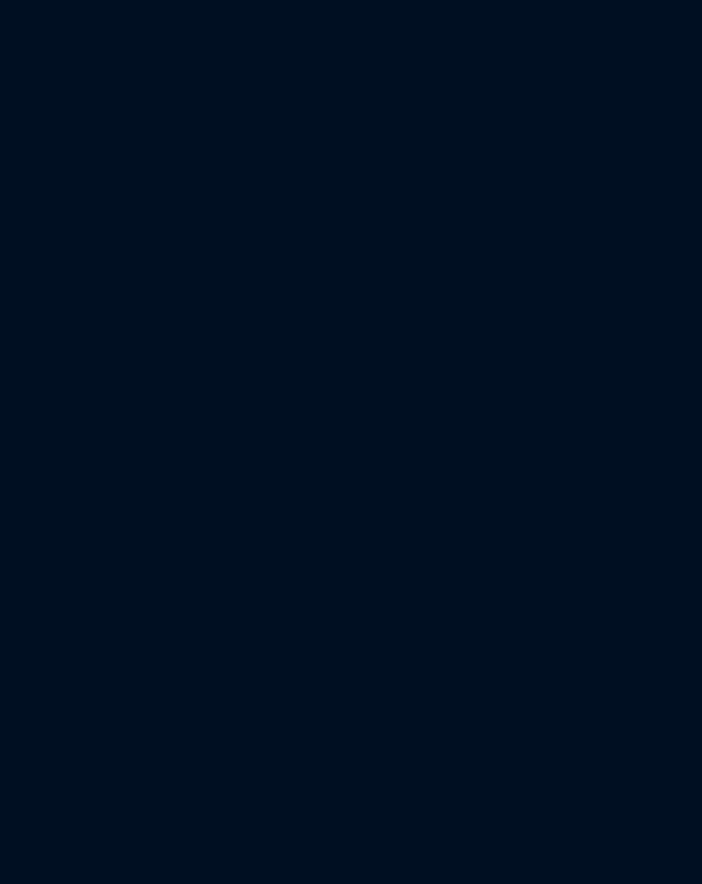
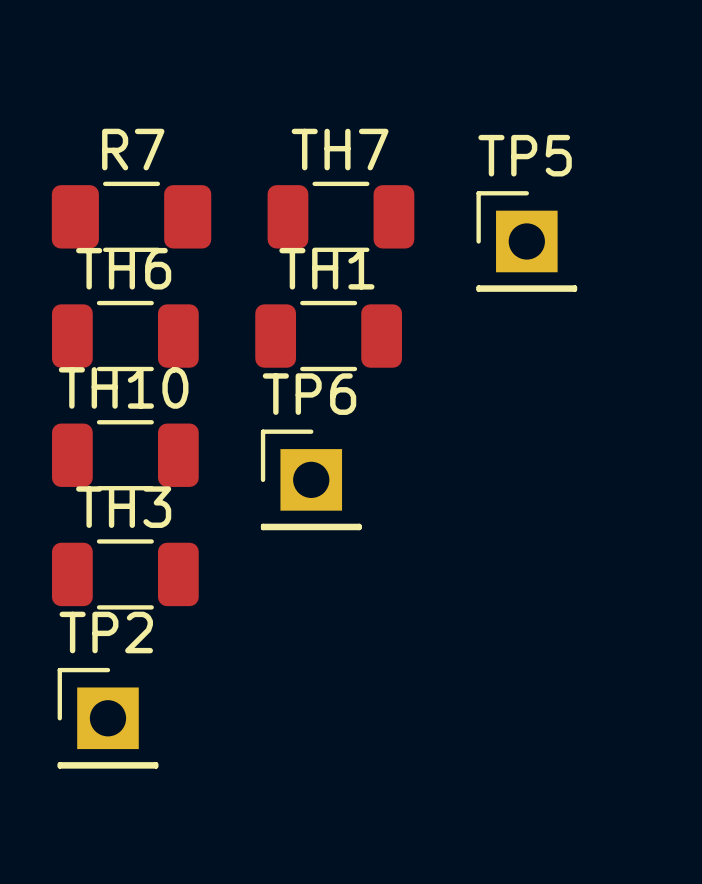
R7: none -> (131, 216)
TH7: none -> (340, 216)
TP5: none -> (526, 241)
TH6: none -> (125, 336)
TH1: none -> (328, 336)
TH10: none -> (125, 455)
TP6: none -> (311, 479)
TH3: none -> (125, 574)
TP2: none -> (107, 718)

